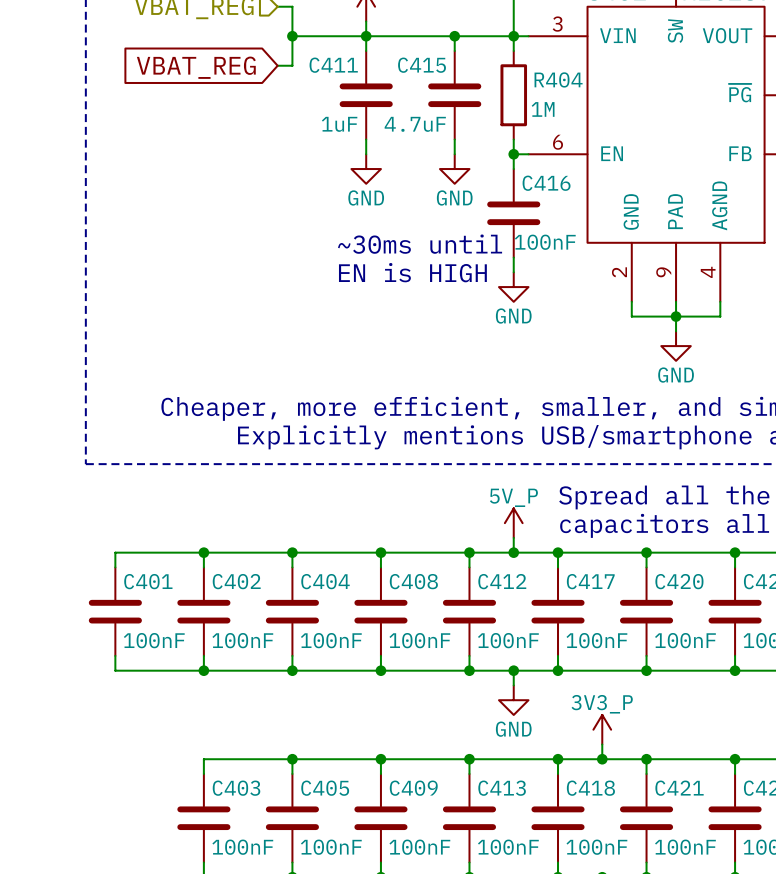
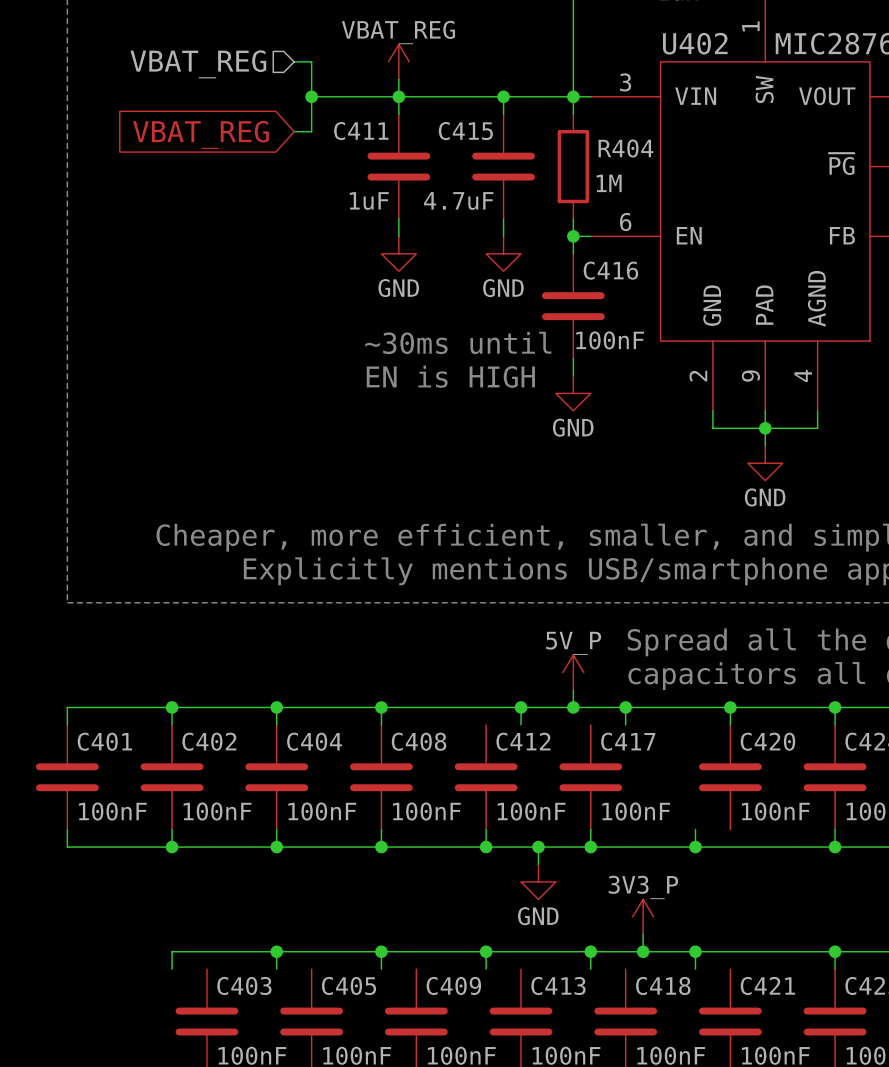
wire: (115, 552) (115, 567) -> (102, 707) (67, 707) (67, 724)
junction: none -> (172, 707)
wire: (203, 552) (203, 567) -> (172, 707) (172, 724)
junction: (203, 552) -> none
junction: none -> (276, 707)
wire: (292, 552) (292, 567) -> (276, 707) (276, 724)
junction: (292, 552) -> none
junction: none -> (381, 707)
wire: (380, 552) (380, 567) -> (381, 707) (381, 724)
junction: (380, 552) -> none
C401 position: (115, 611) -> (67, 777)
C402 position: (203, 611) -> (172, 777)
C404 position: (292, 611) -> (276, 777)
C408 position: (380, 611) -> (381, 777)
C412 position: (469, 611) -> (486, 777)
C417 position: (558, 611) -> (590, 777)
wire: (115, 655) (115, 670) -> (67, 829) (67, 847) (102, 847)
wire: (203, 655) (203, 670) -> (172, 829) (172, 847)
wire: (292, 655) (292, 670) -> (276, 829) (276, 847)
wire: (380, 655) (380, 670) -> (381, 829) (381, 847)
wire: (469, 655) (469, 670) -> (486, 829) (486, 847)
wire: (558, 655) (558, 670) -> (590, 829) (590, 847)
wire: (646, 655) (646, 670) -> (695, 829) (695, 847)
junction: none -> (172, 847)
junction: (203, 670) -> none
junction: none -> (276, 847)
junction: (292, 670) -> none
junction: none -> (381, 847)
junction: (380, 670) -> none
junction: none -> (486, 847)
junction: (469, 670) -> none
junction: none -> (538, 847)
wire: (513, 670) (513, 685) -> (538, 847) (538, 864)
junction: (513, 670) -> none
junction: none -> (590, 847)
junction: (558, 670) -> none
junction: none -> (695, 847)
junction: (646, 670) -> none
power symbol position: GND (513, 700) -> GND (538, 881)
power symbol position: 3V3_P (602, 729) -> 3V3_P (643, 916)
wire: (602, 744) (602, 759) -> (643, 934) (643, 951)
wire: (203, 759) (203, 773) -> (206, 951) (172, 951) (172, 969)
junction: none -> (276, 951)
wire: (292, 759) (292, 773) -> (276, 951) (276, 969)
junction: (292, 759) -> none
junction: none -> (381, 951)
wire: (380, 759) (380, 773) -> (381, 951) (381, 969)
junction: (380, 759) -> none
junction: none -> (486, 951)
wire: (469, 759) (469, 773) -> (486, 951) (486, 969)
junction: (469, 759) -> none
junction: none -> (590, 951)
wire: (558, 759) (558, 773) -> (590, 951) (590, 969)
junction: (558, 759) -> none
junction: none -> (643, 951)
junction: (602, 759) -> none
junction: none -> (695, 951)
wire: (646, 759) (646, 773) -> (695, 951) (695, 969)
junction: (646, 759) -> none

